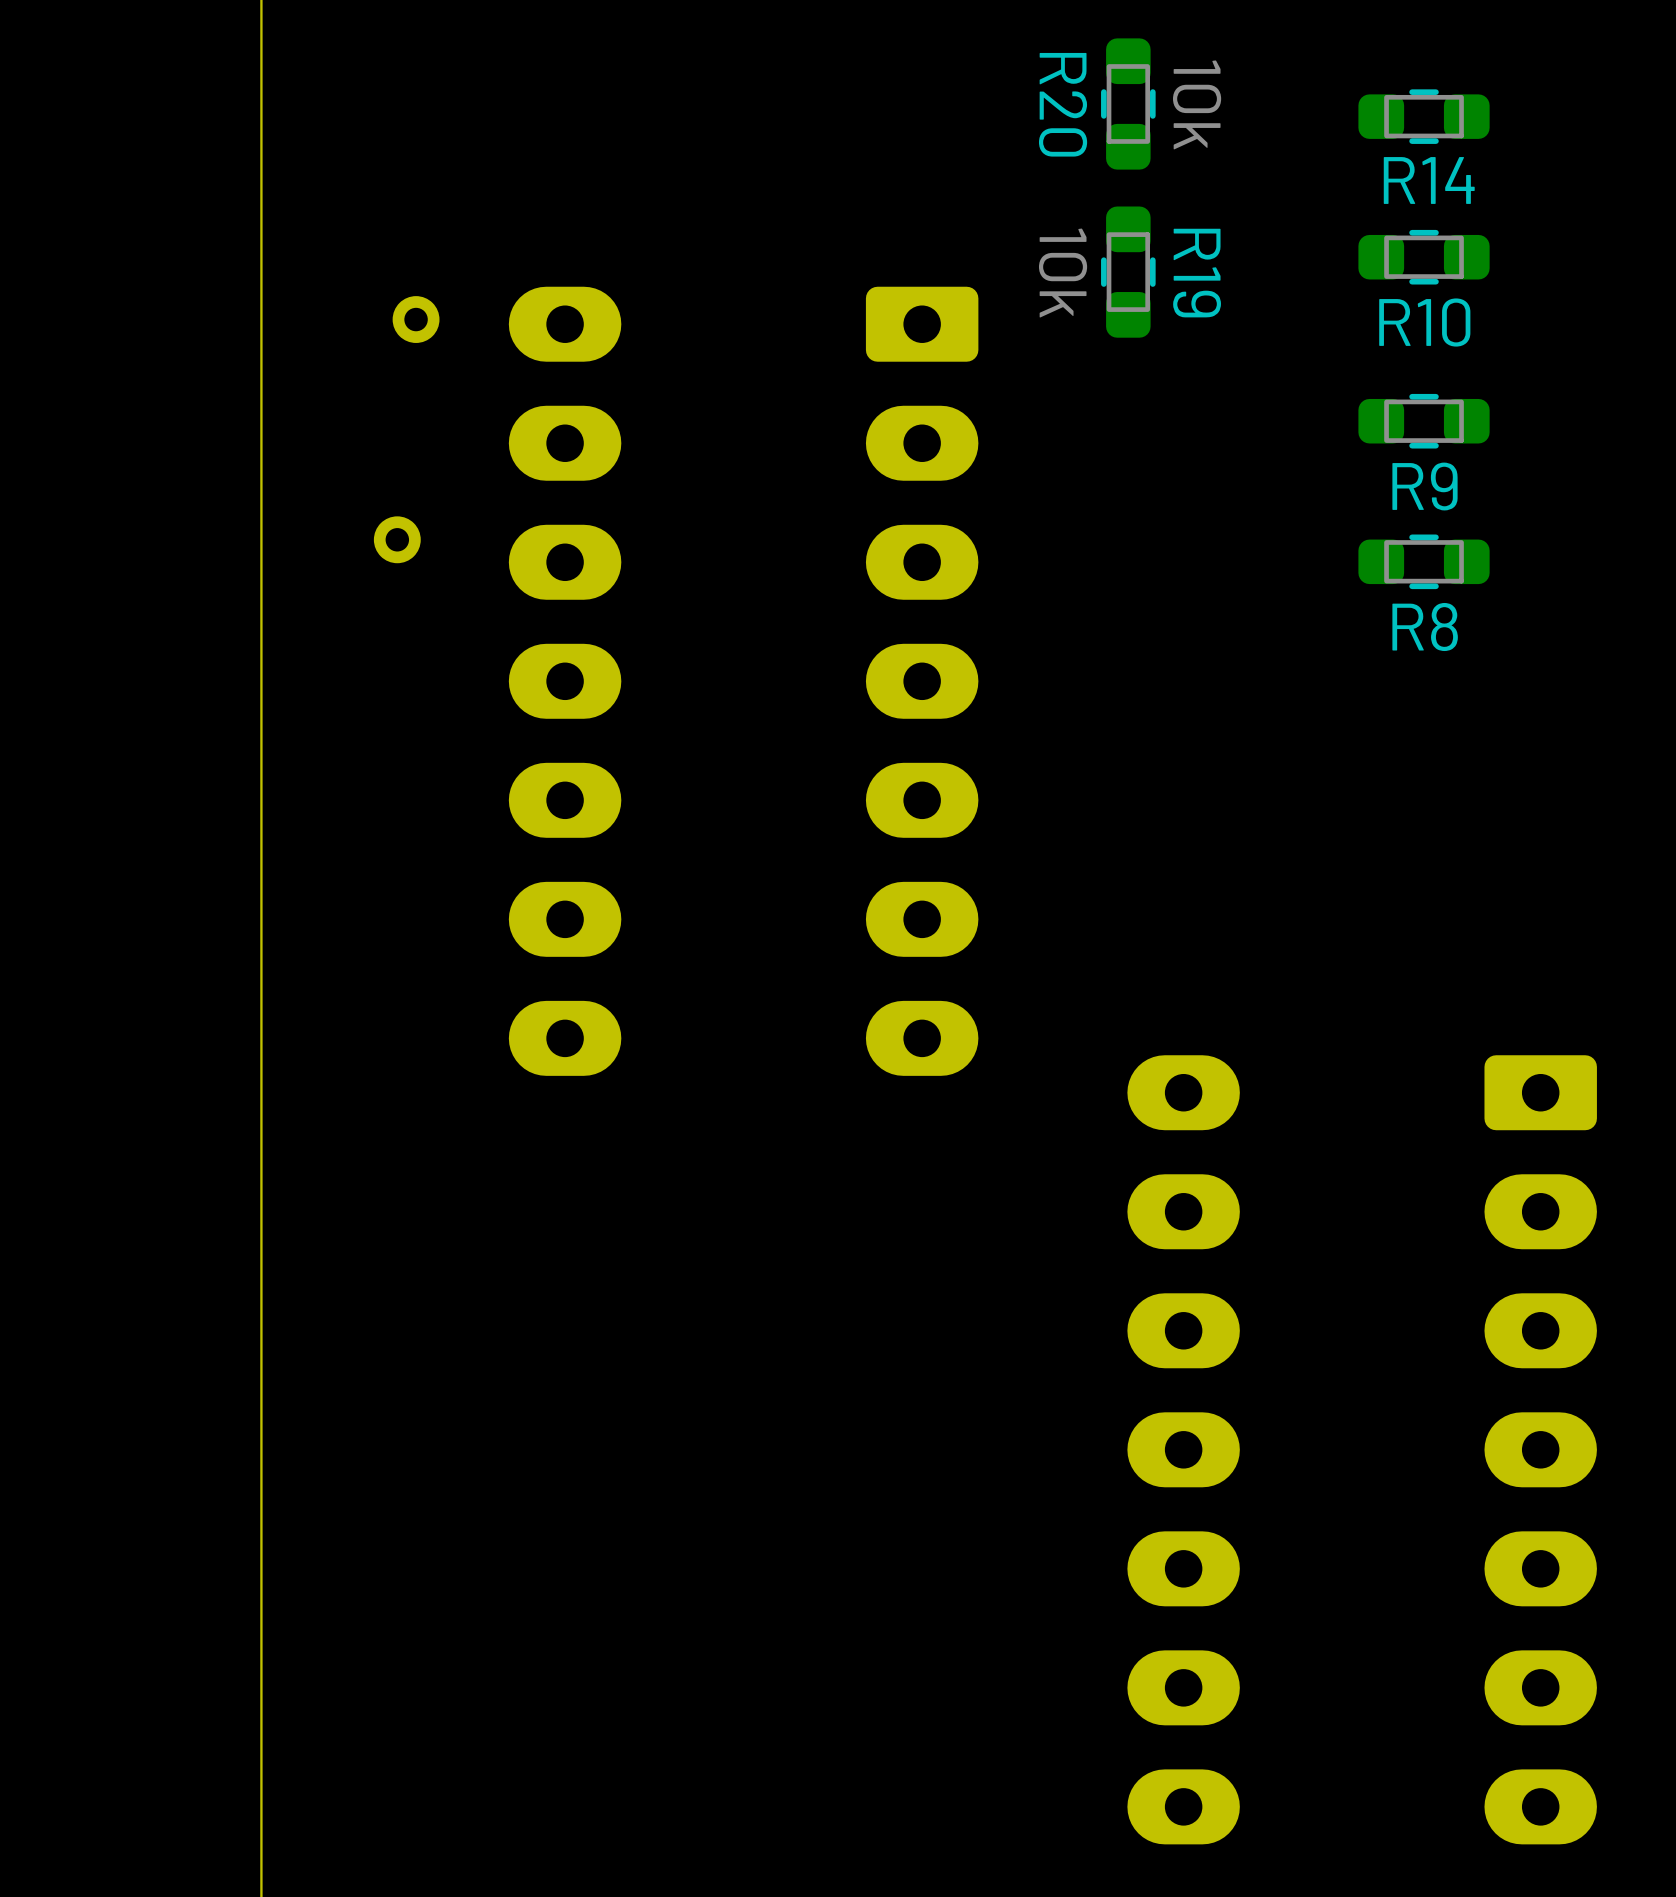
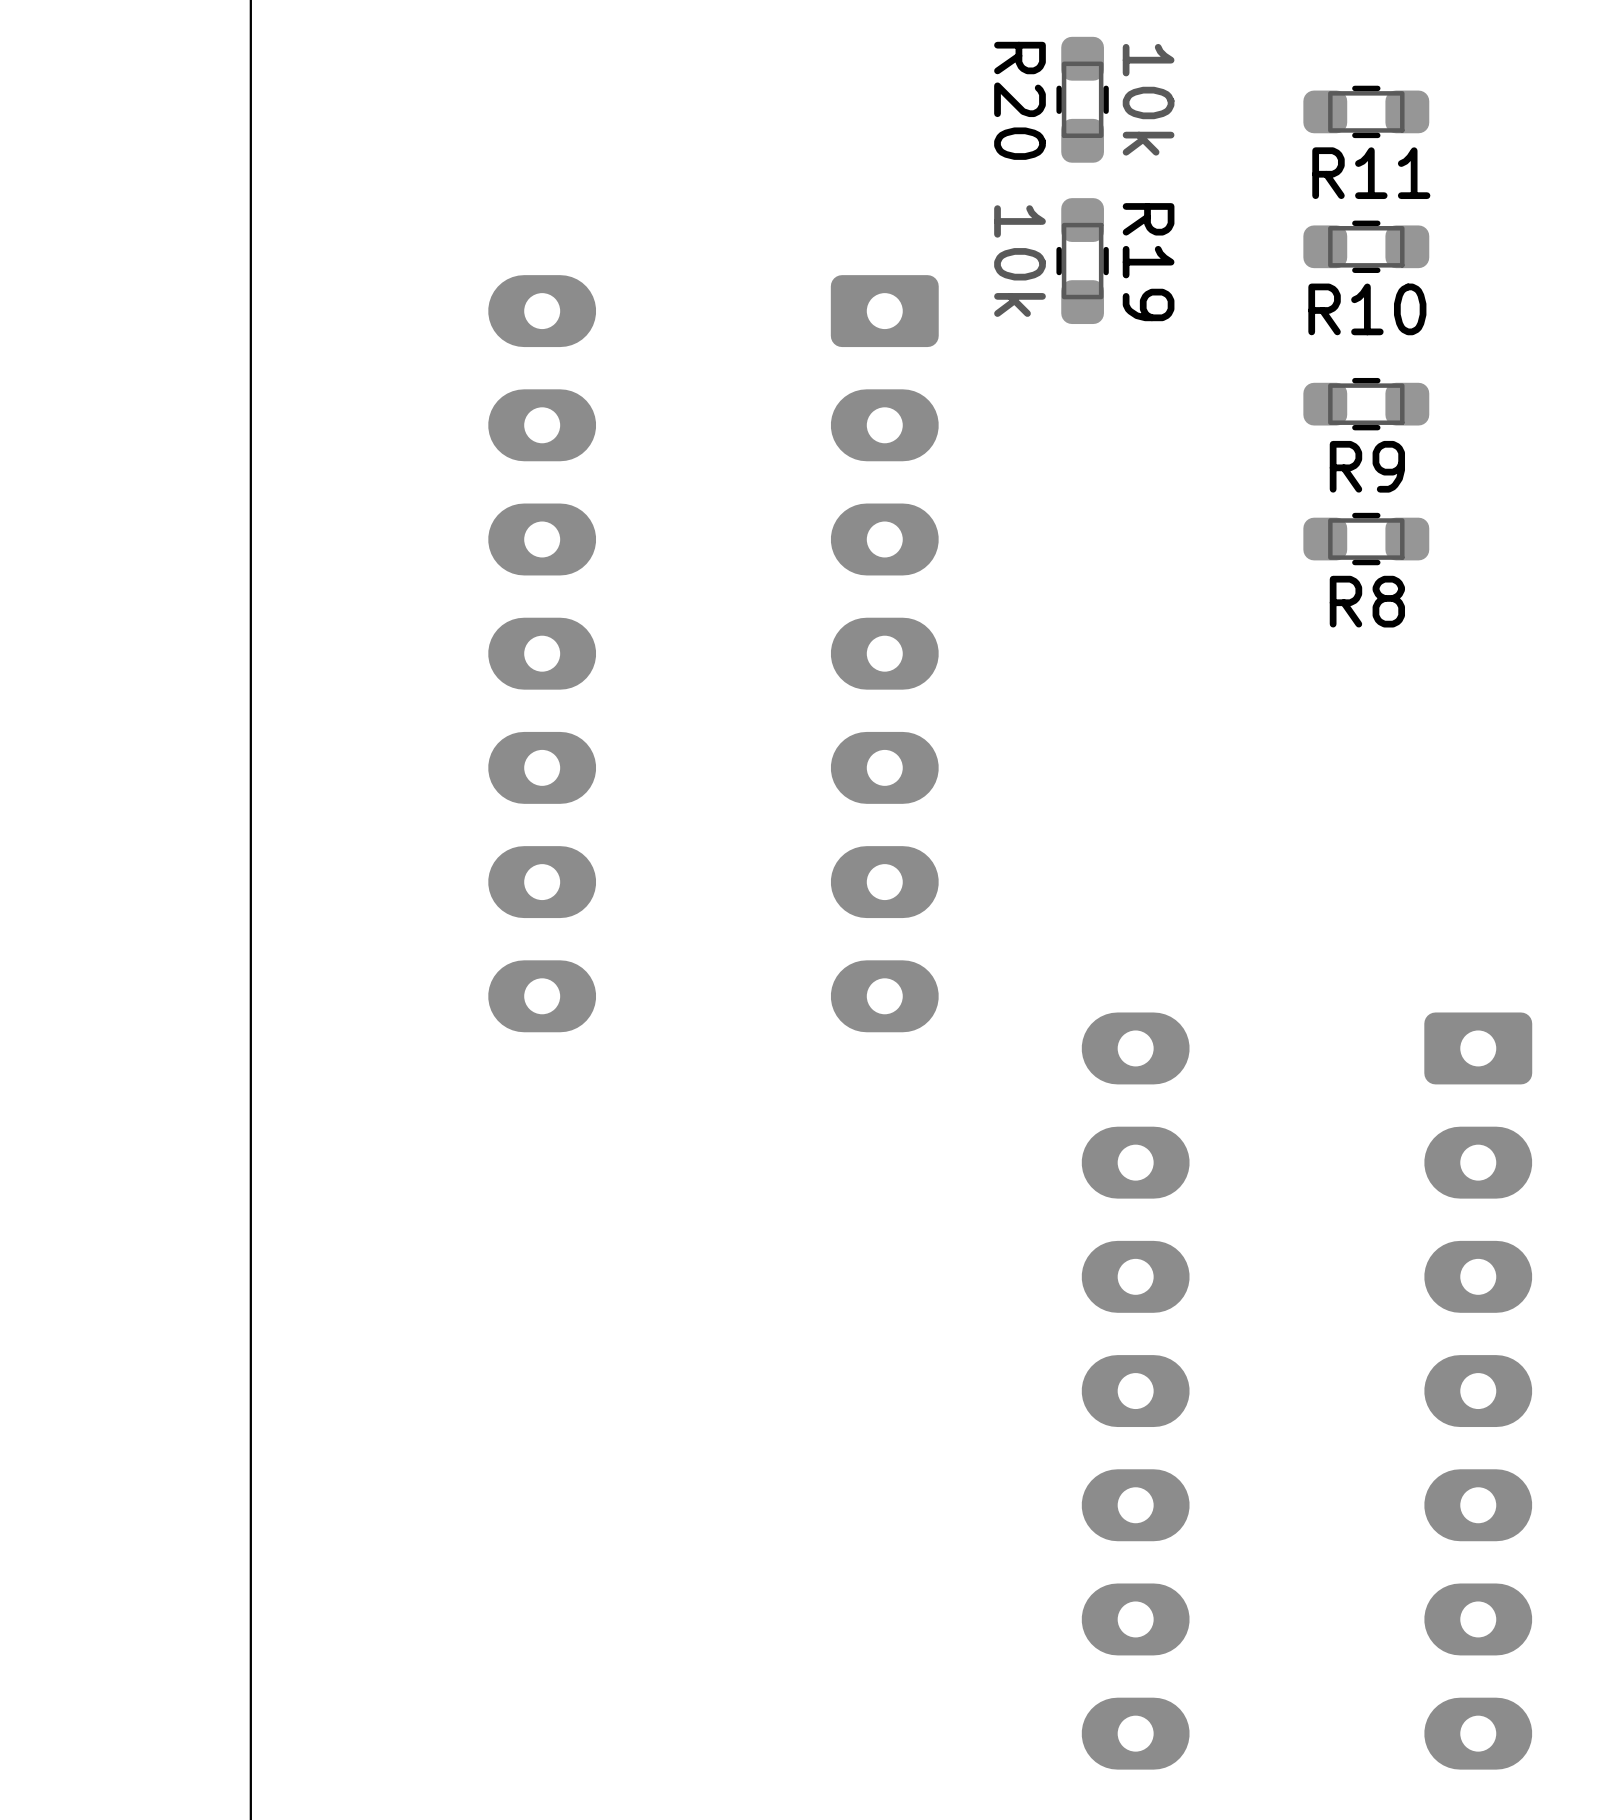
R14 name: R14 (1429, 180) -> R11 (1371, 173)
part: (416, 319) -> none
part: (397, 539) -> none

